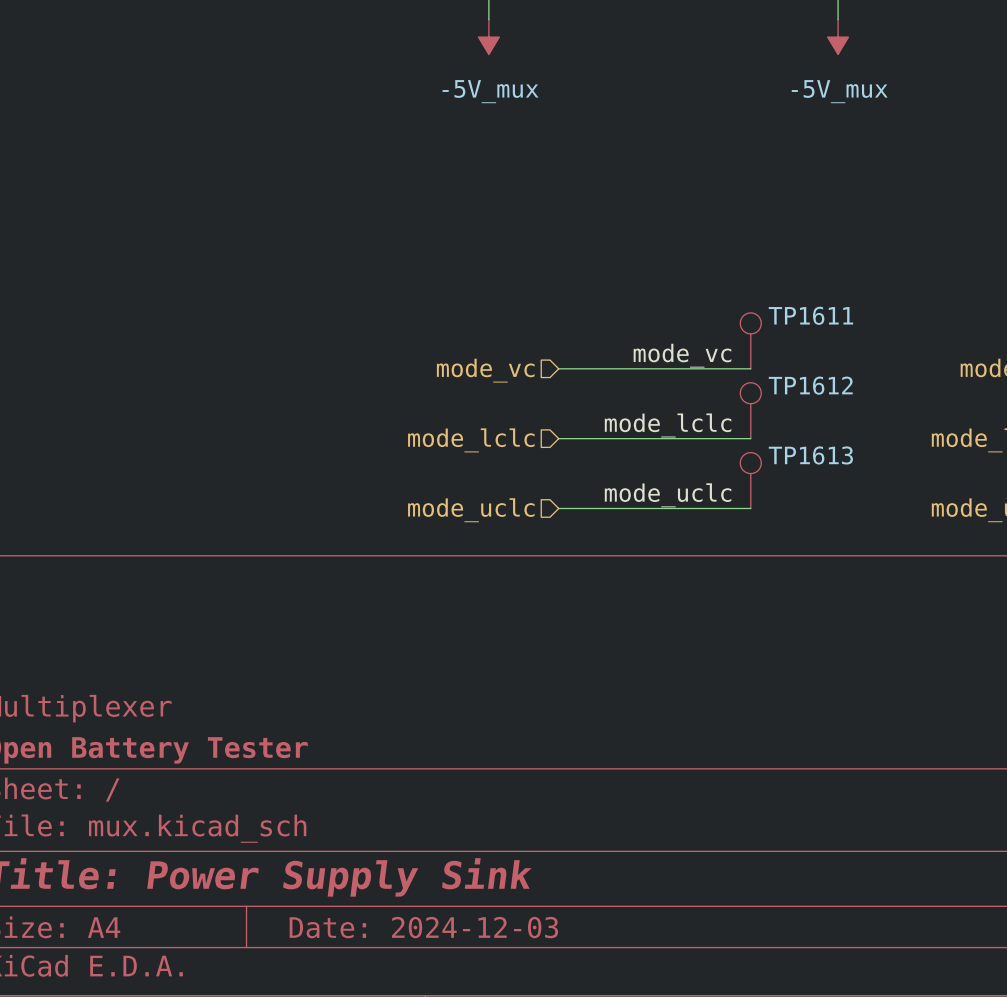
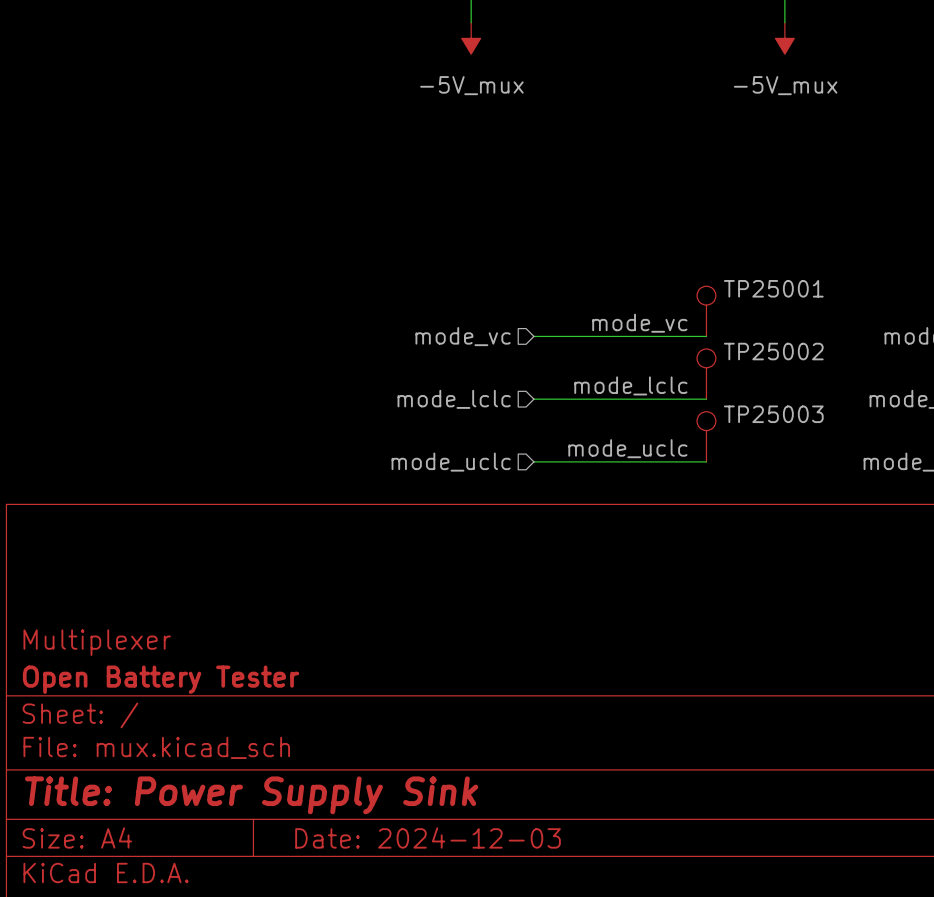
TP1611 name: TP1611 (810, 315) -> TP25001 (773, 288)
TP1612 name: TP1612 (810, 385) -> TP25002 (773, 351)
TP1613 name: TP1613 (810, 455) -> TP25003 (773, 414)

